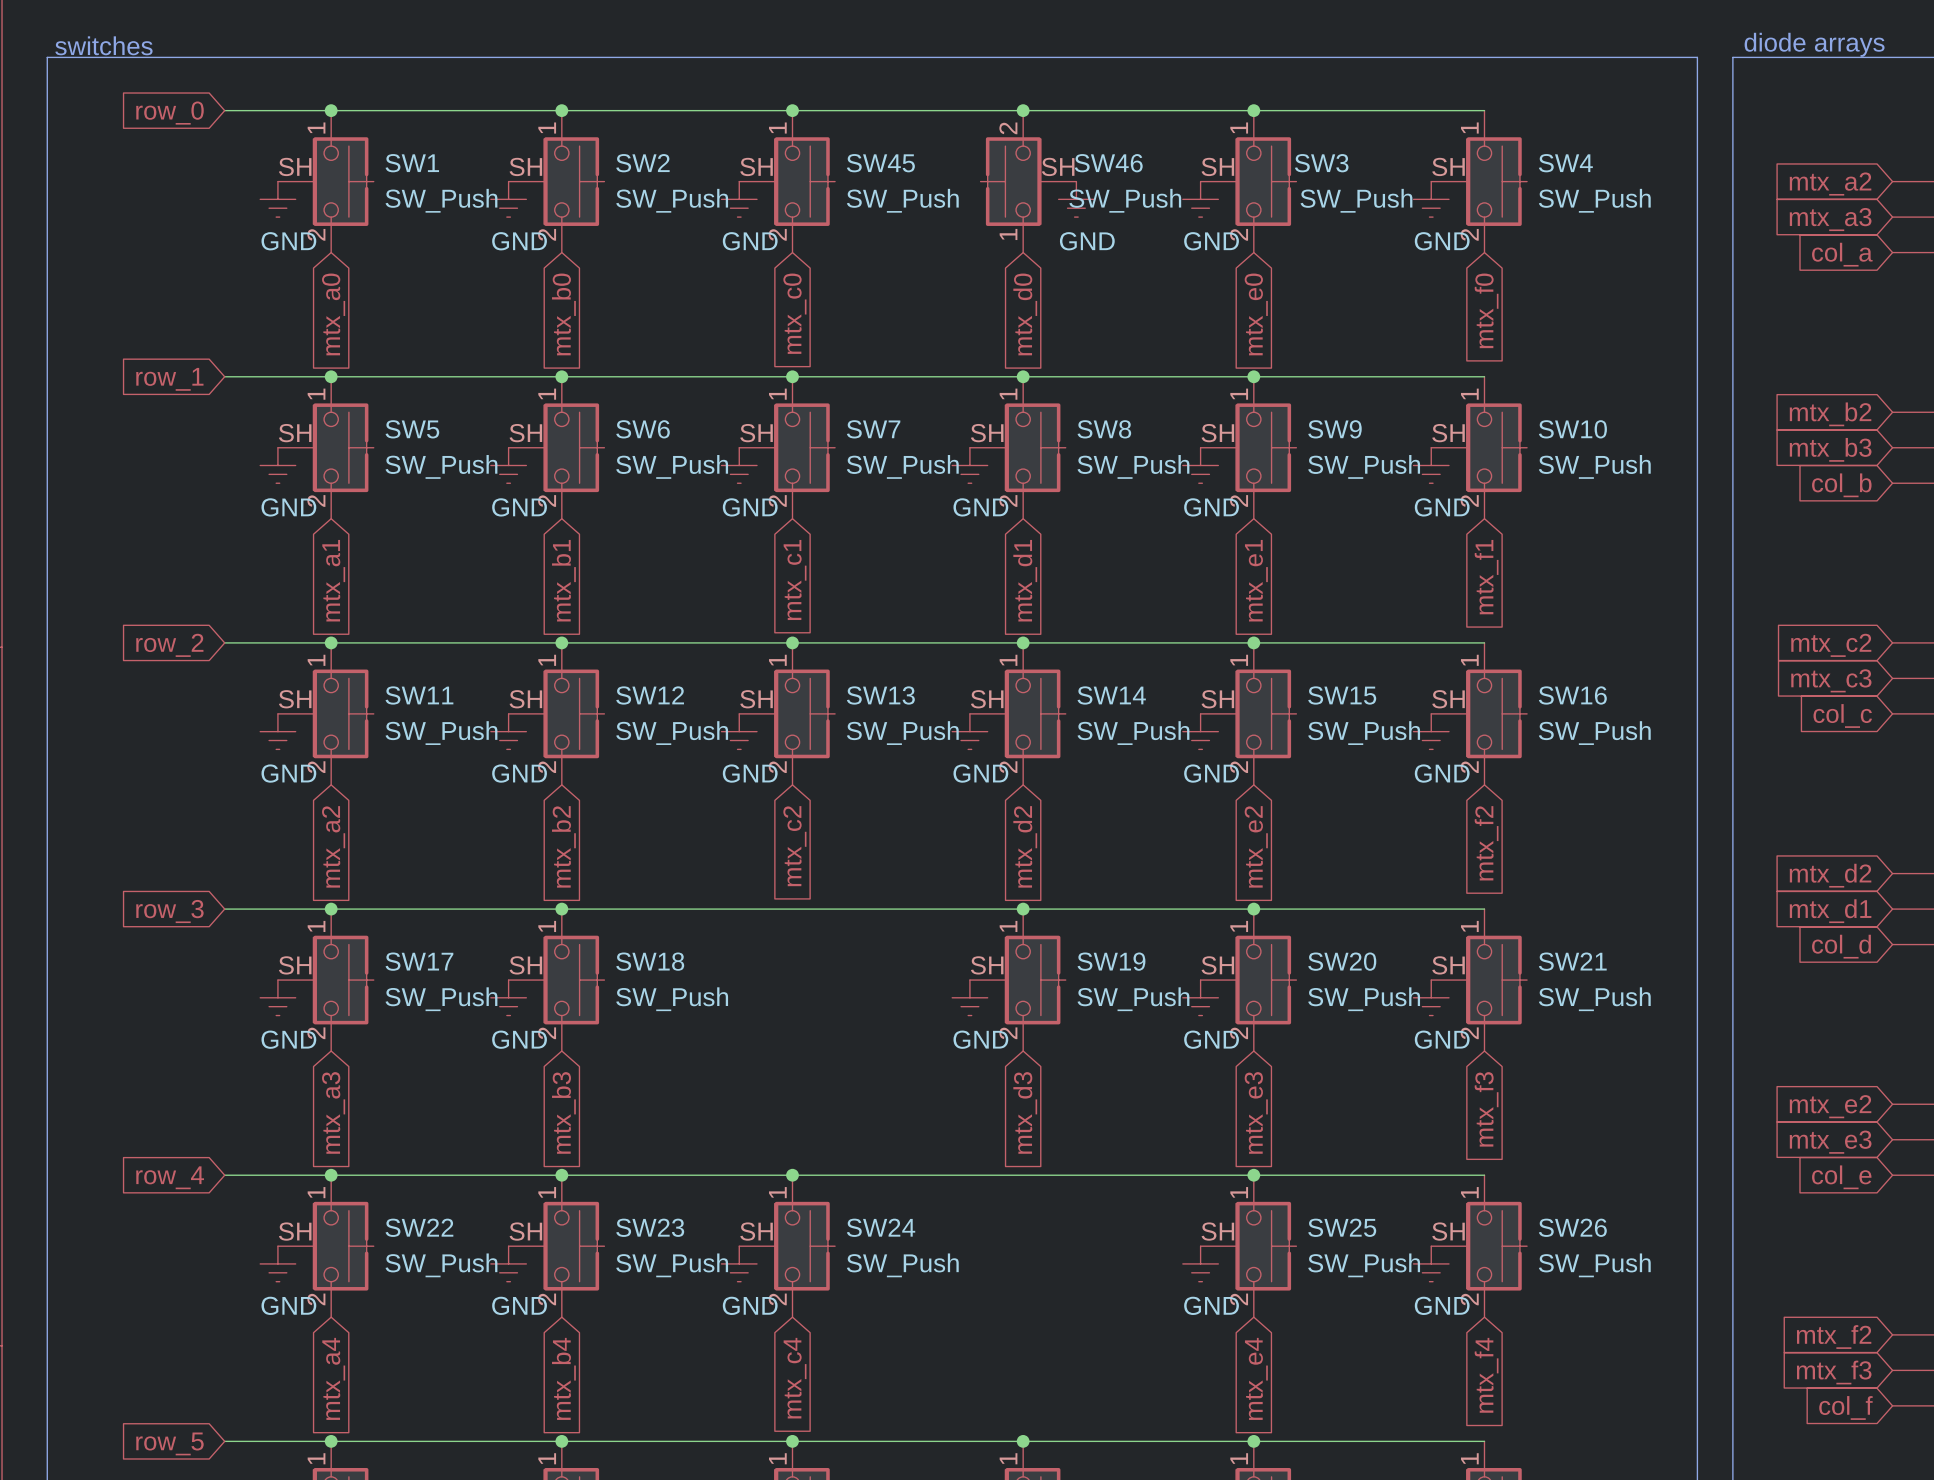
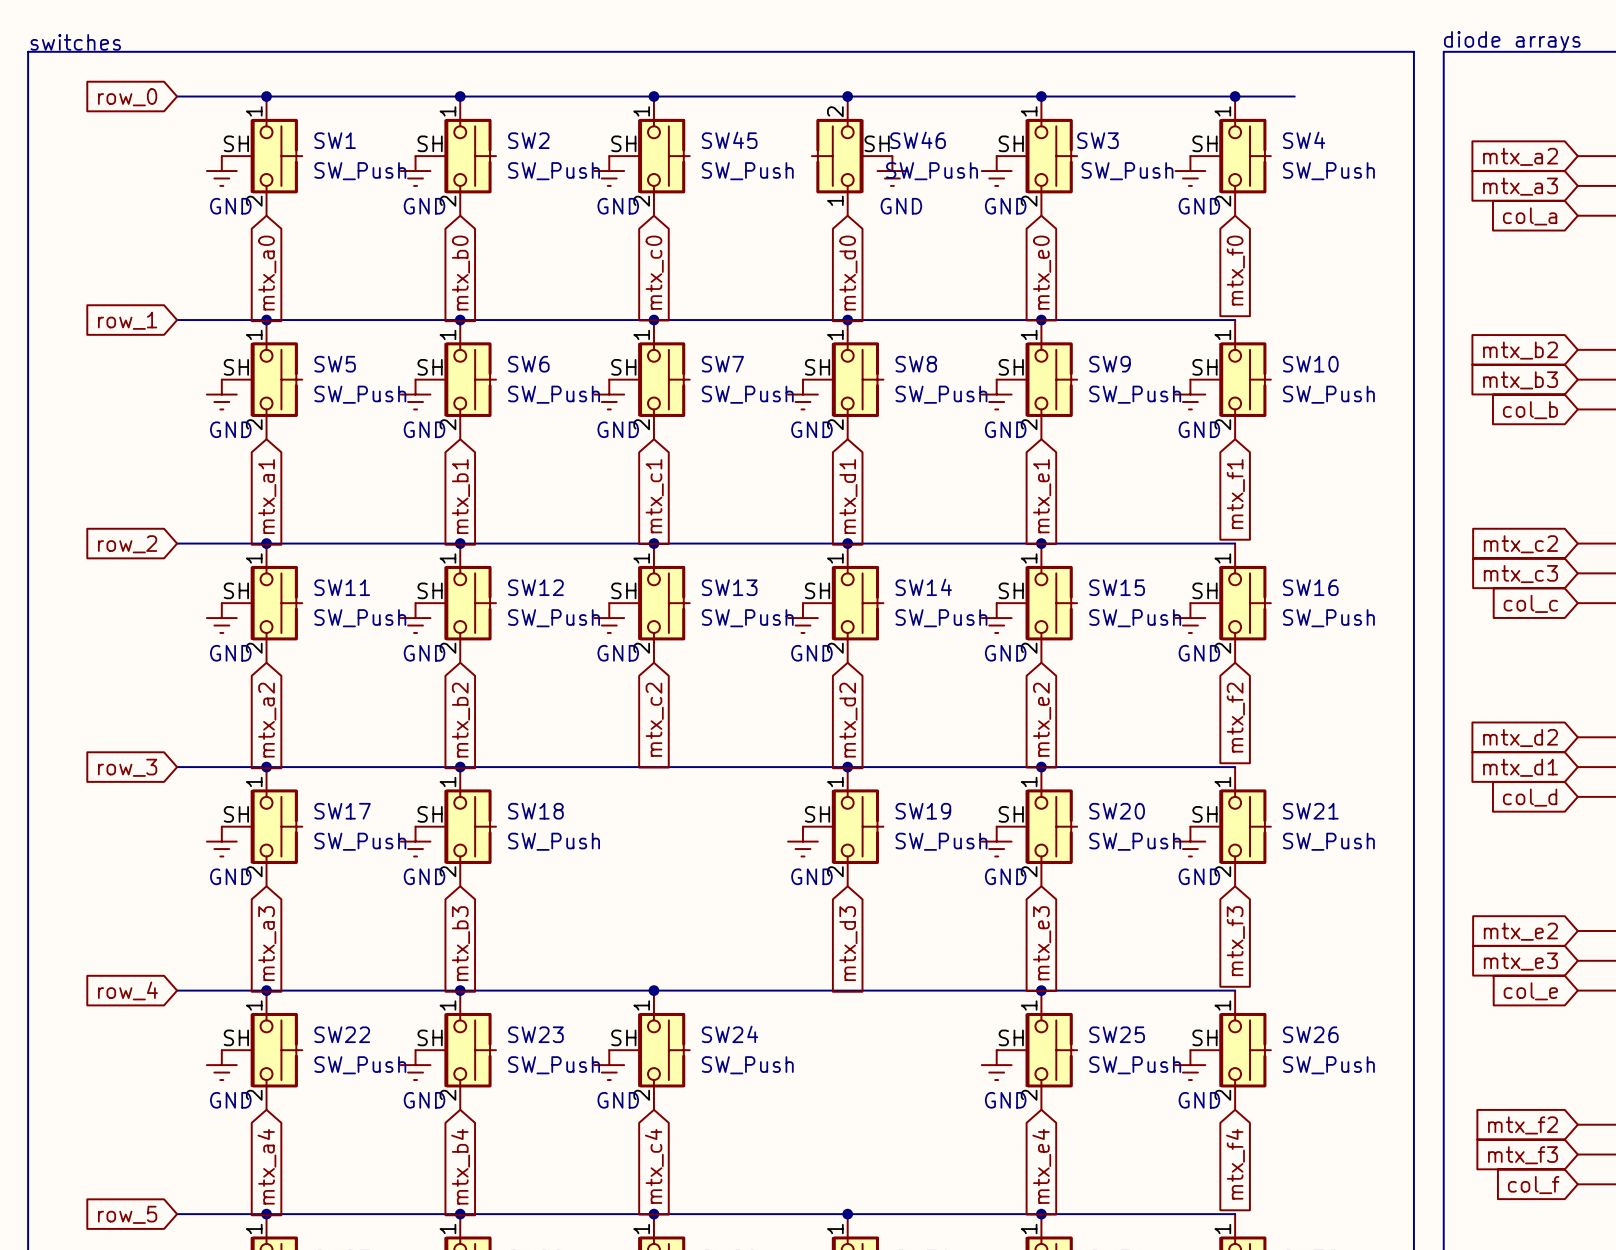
wire: none -> (1235, 96) (1294, 96)
junction: none -> (1235, 96)

